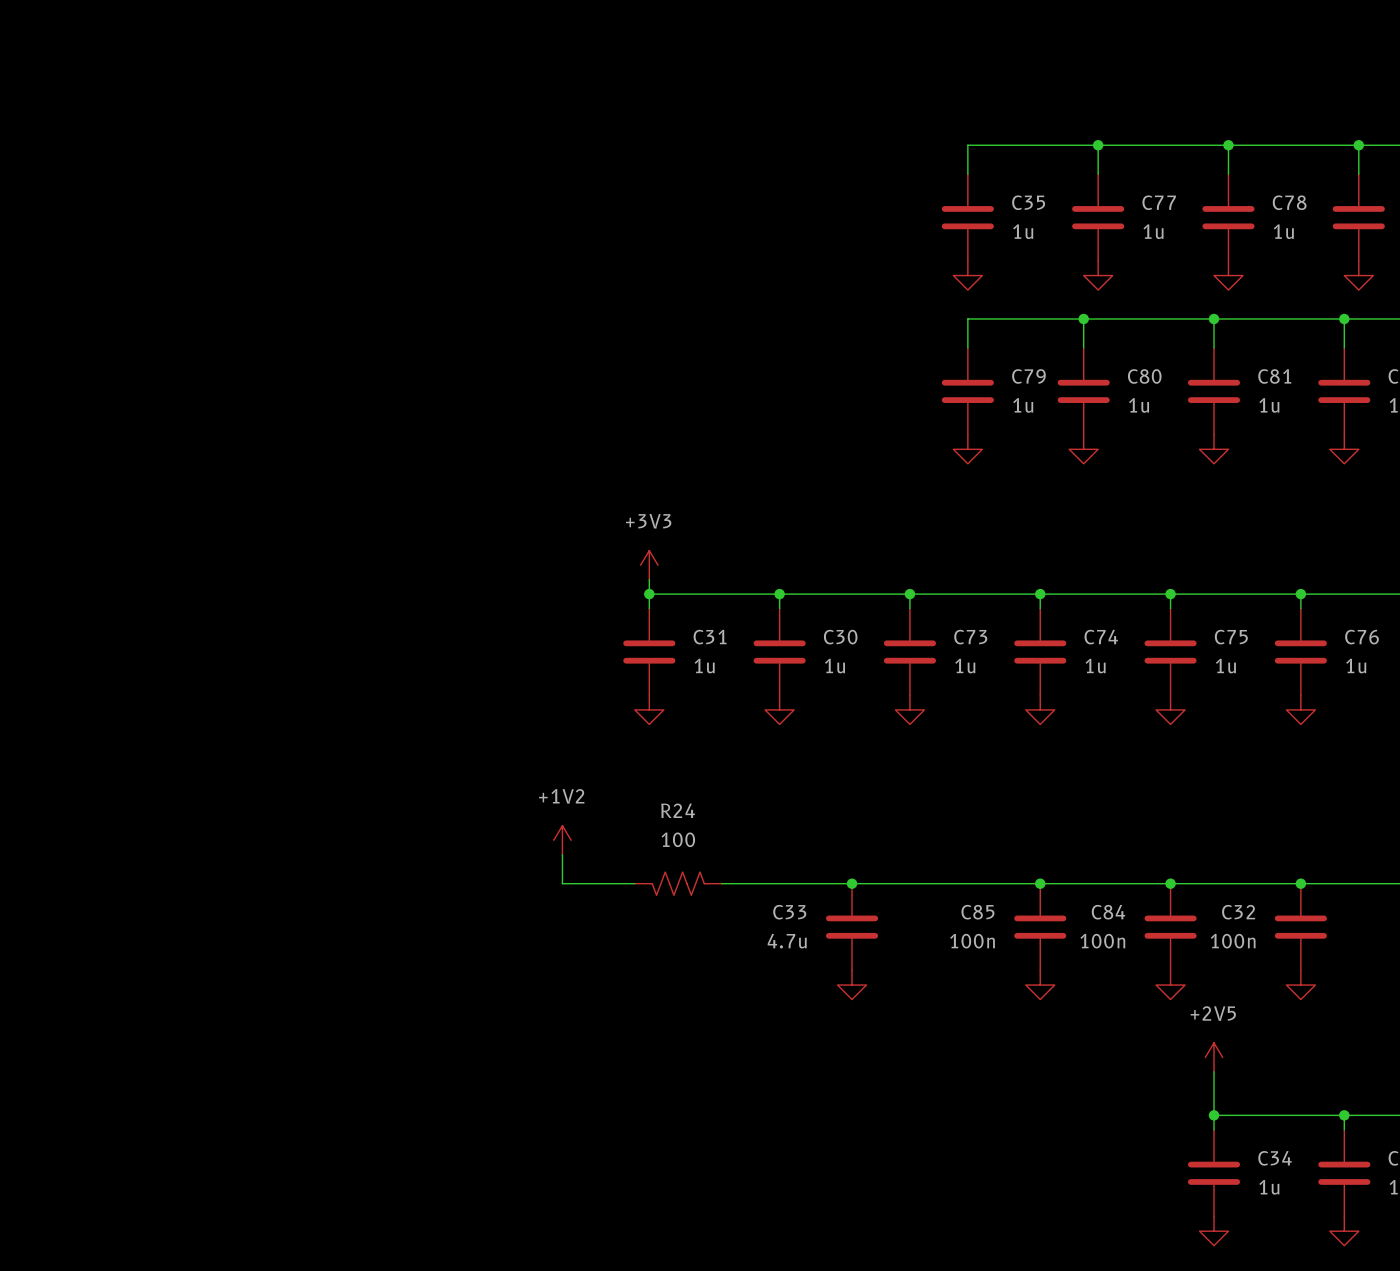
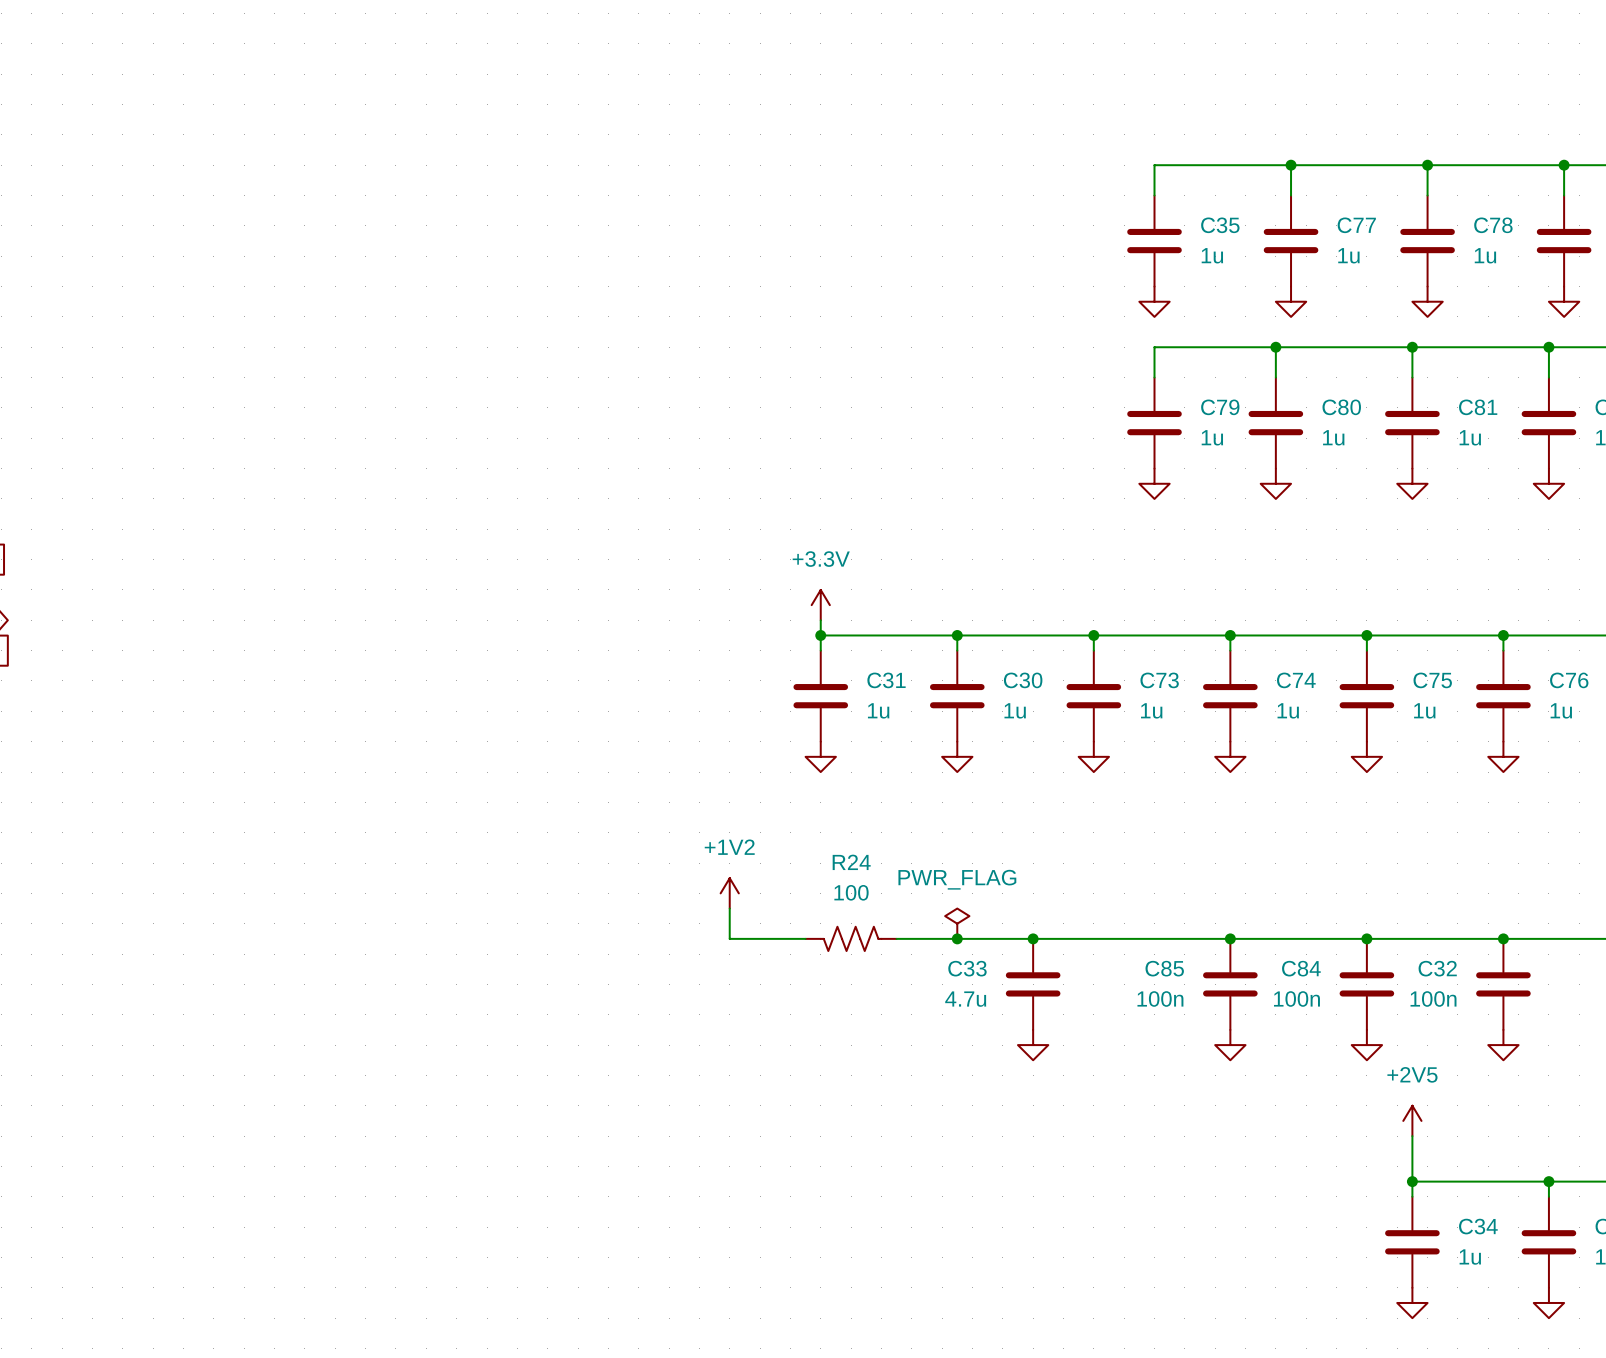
power symbol: +3V3 (649, 565) -> +3.3V (820, 605)
power symbol: none -> PWR_FLAG (957, 923)
junction: none -> (957, 938)

